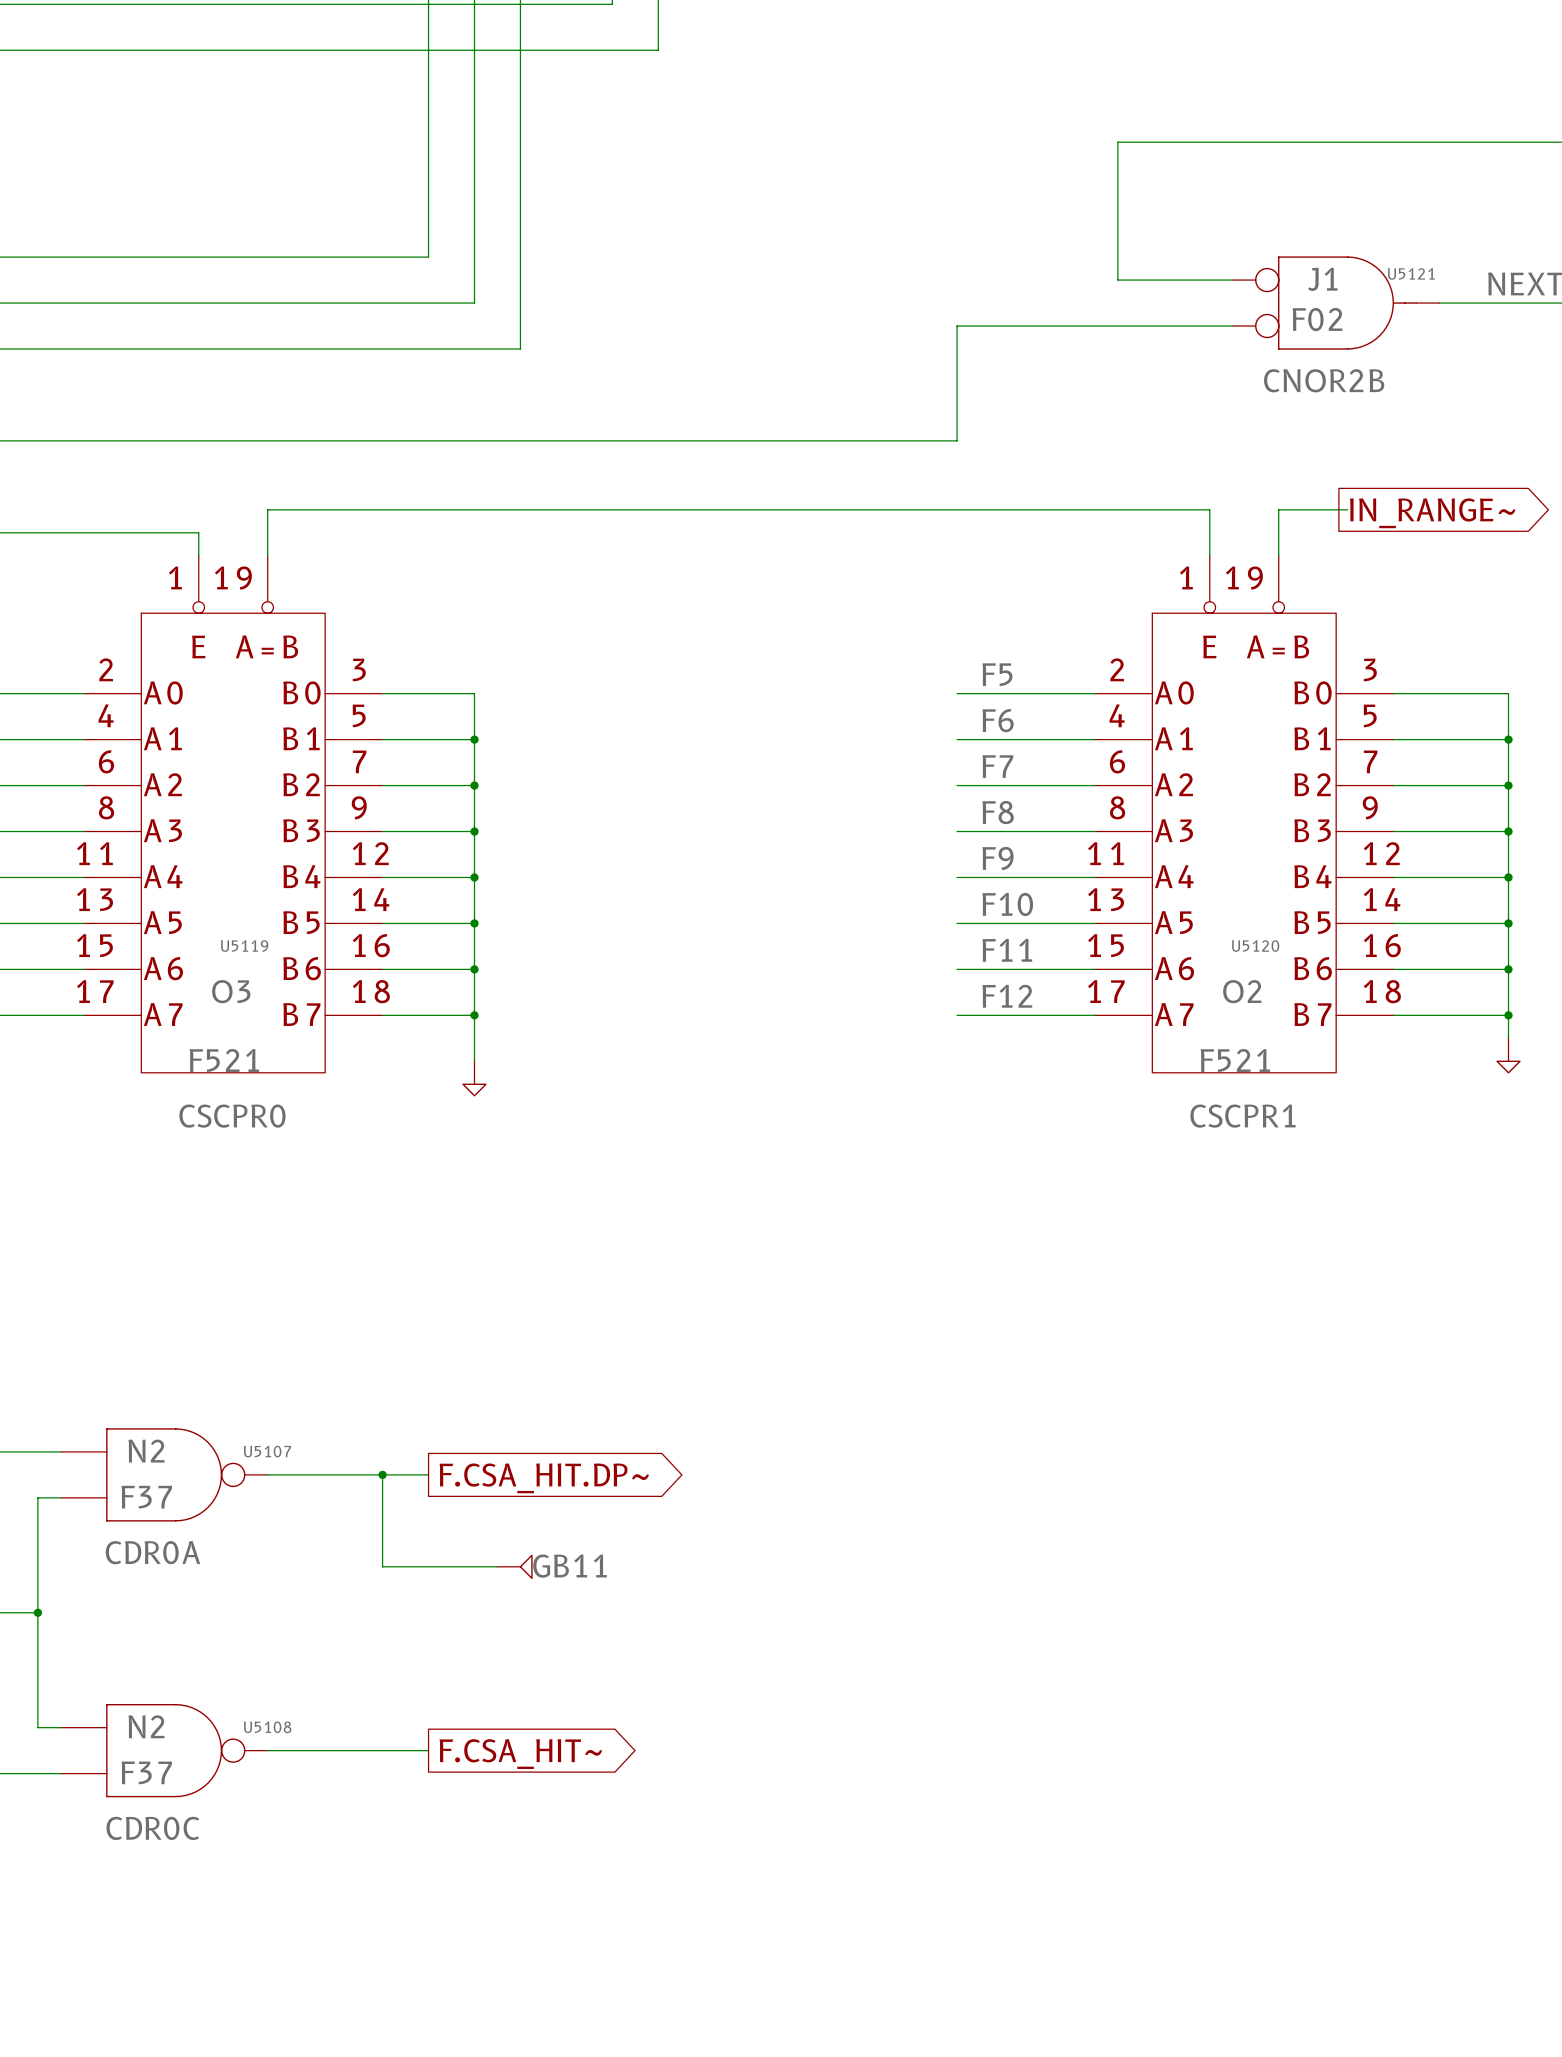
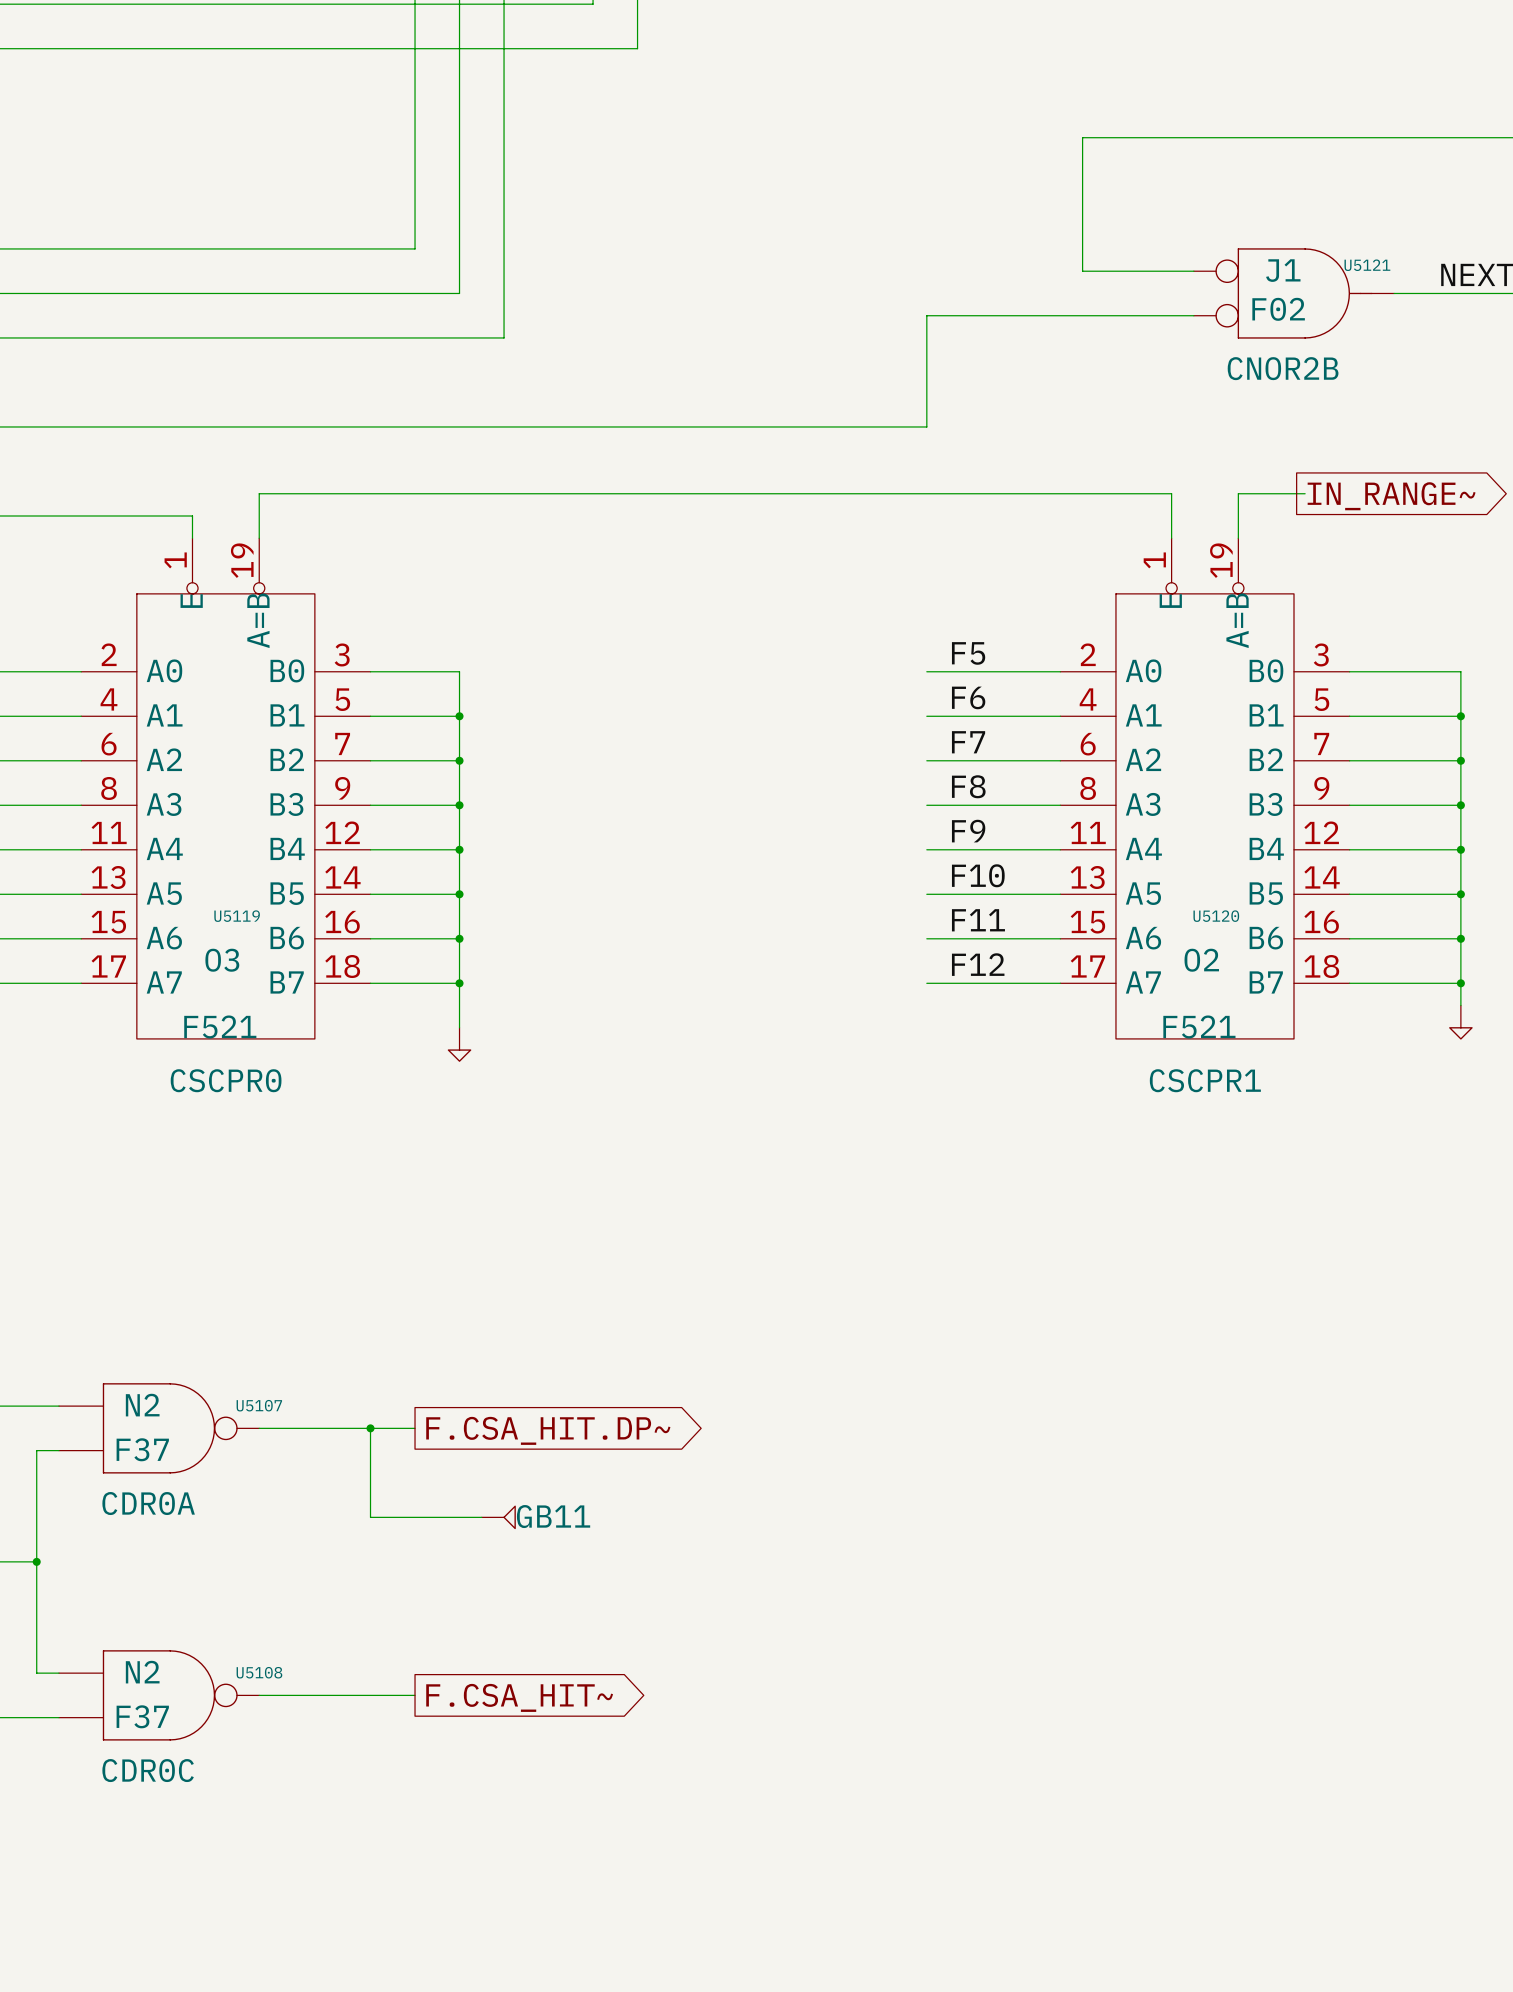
U5119 symbol: [83, 555, 383, 1073] -> [81, 538, 371, 1039]
U5120 symbol: [1094, 555, 1394, 1073] -> [1060, 538, 1350, 1039]

